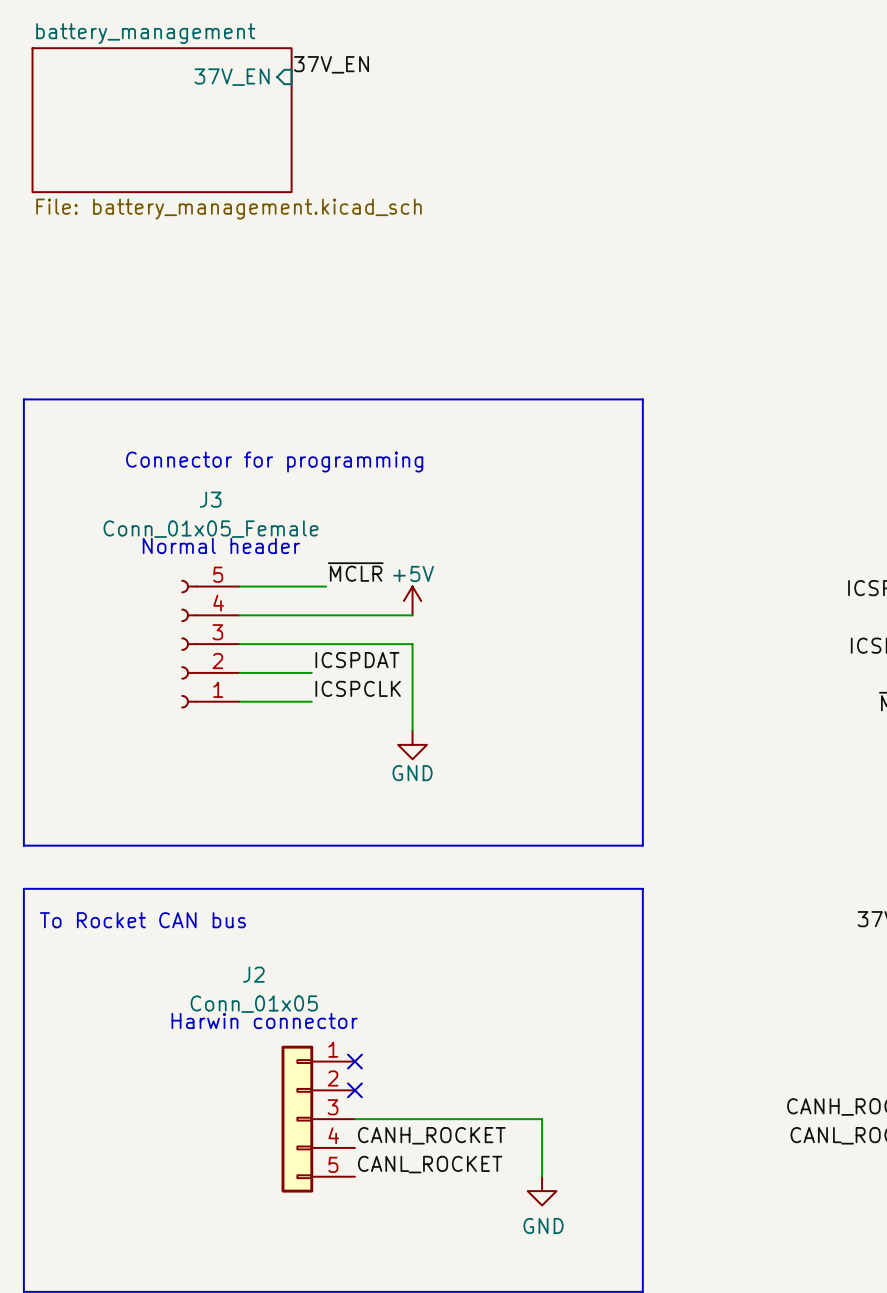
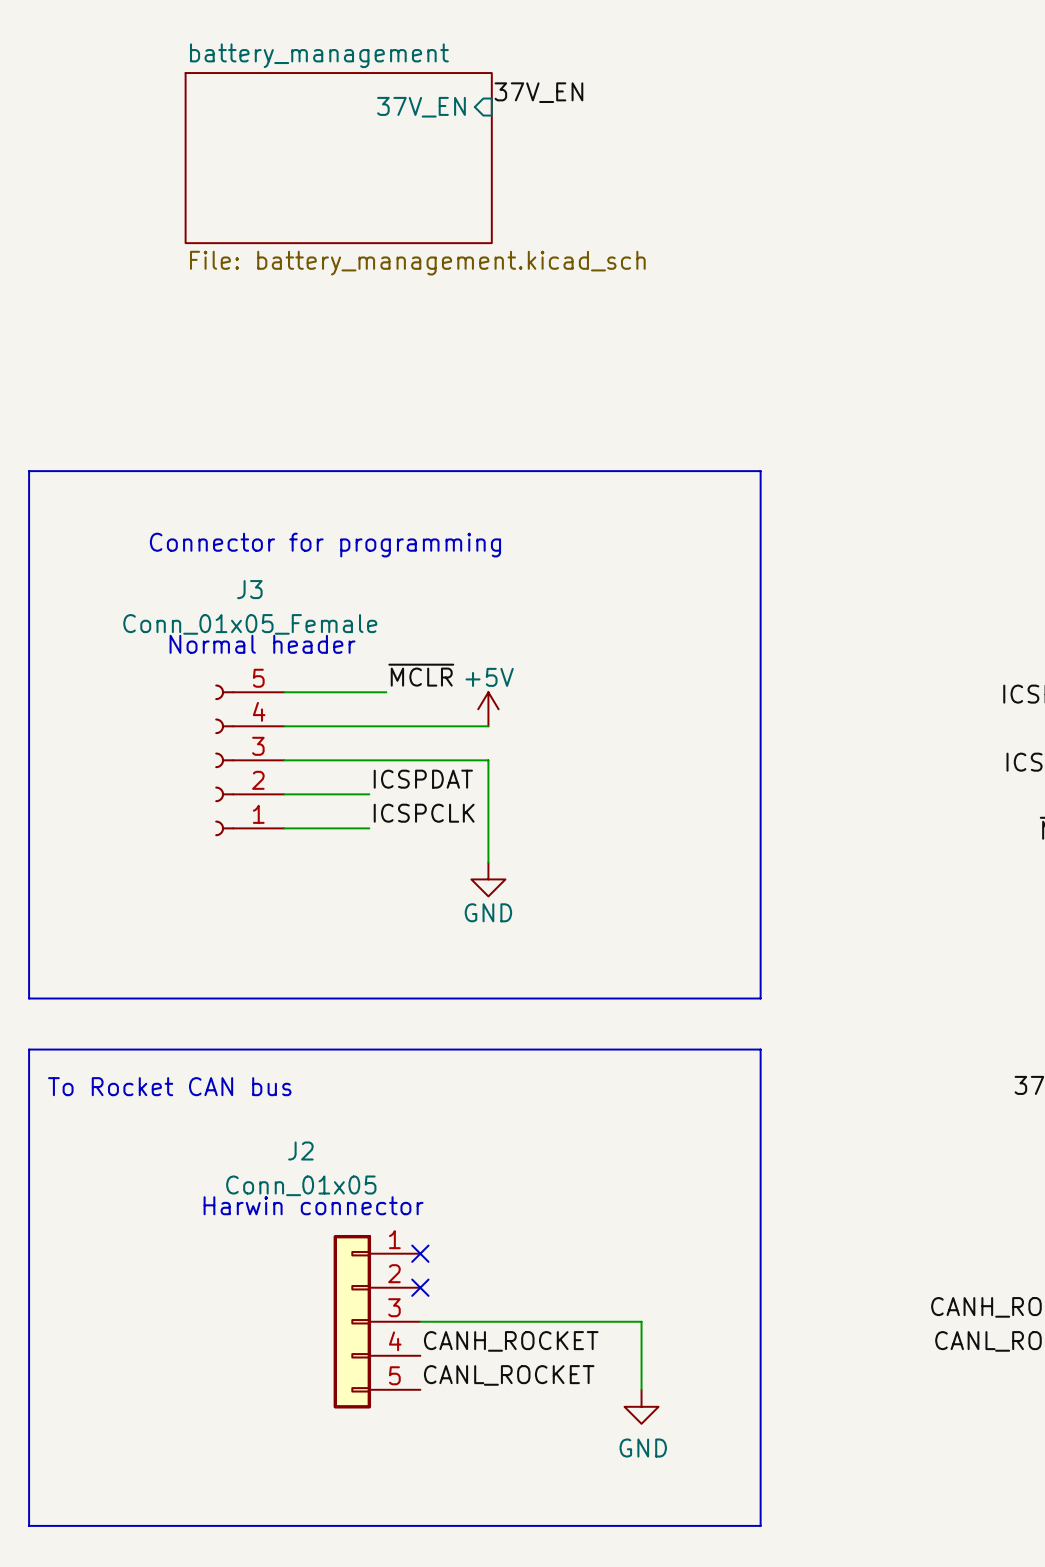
label position: 37V_EN (331, 64) -> 37V_EN (538, 92)
sheet pin position: 37V_EN (232, 77) -> 37V_EN (421, 107)
sheet battery_management position: (162, 120) -> (338, 158)

